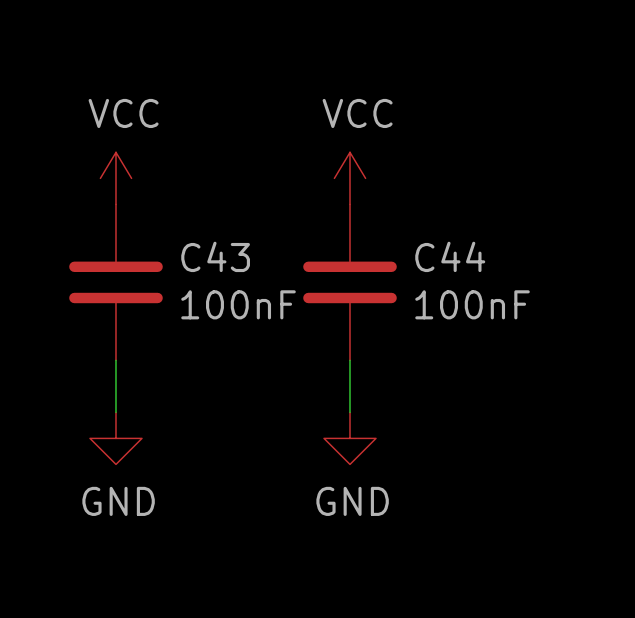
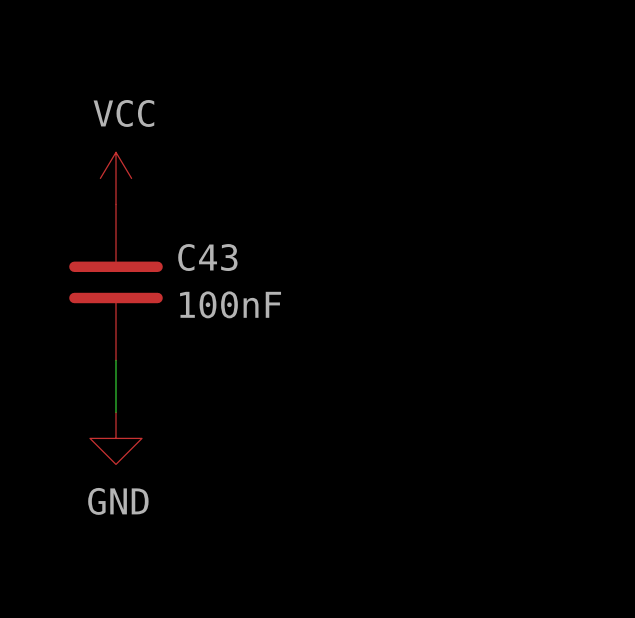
power symbol: VCC (350, 178) -> none
C44: 100nF (350, 282) -> none
wire: (350, 360) (350, 412) -> none
power symbol: GND (350, 438) -> none

